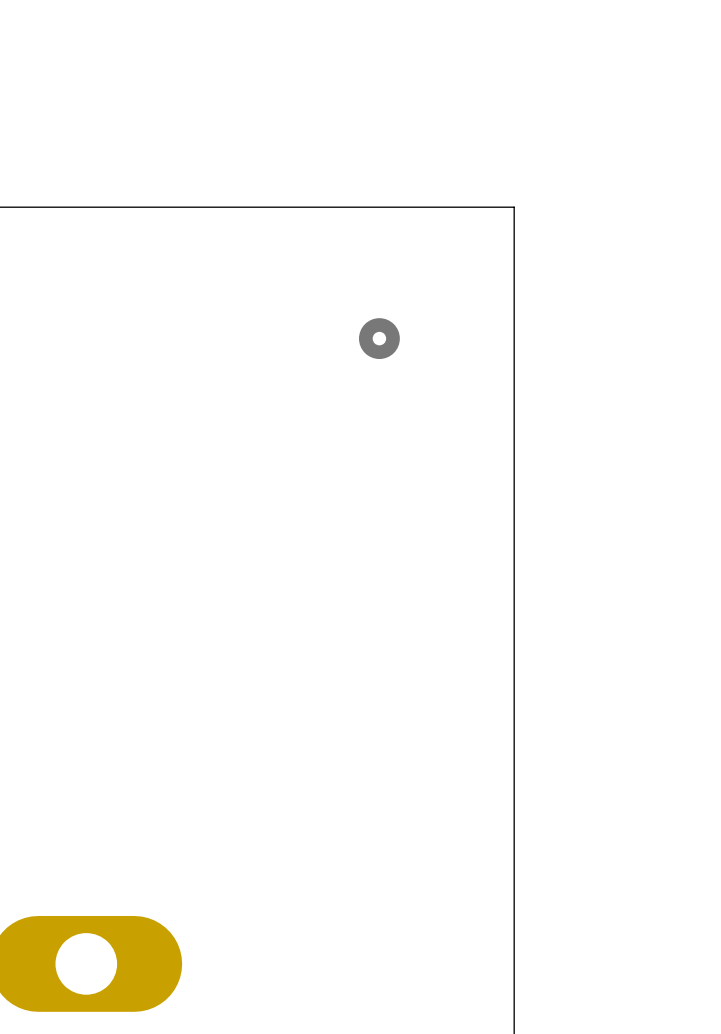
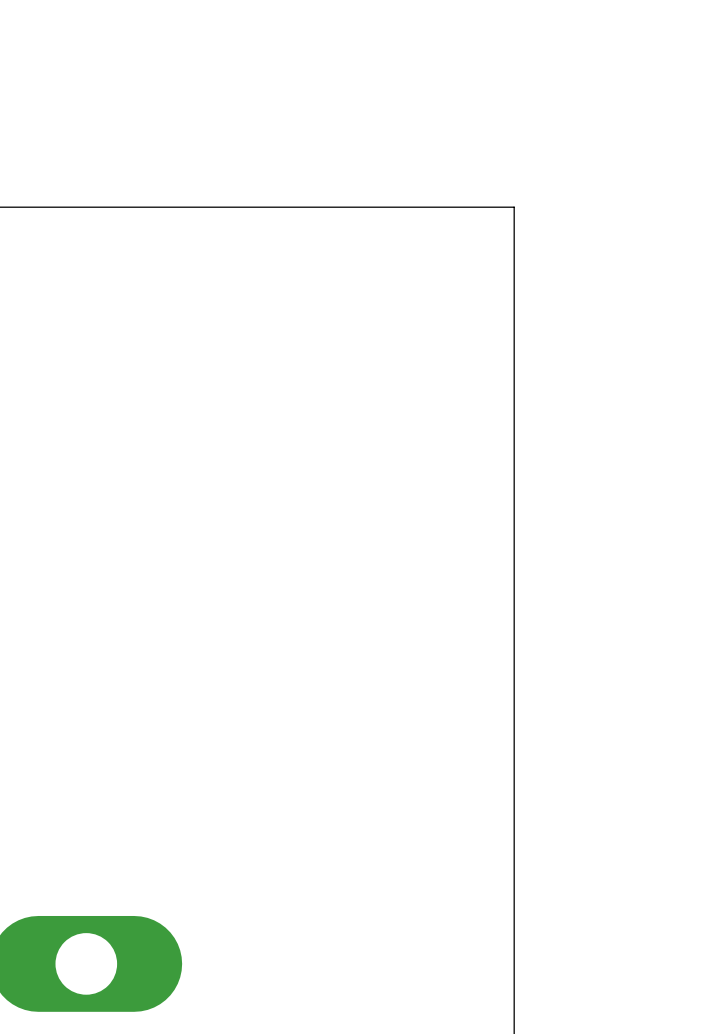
via: (379, 338) -> none

